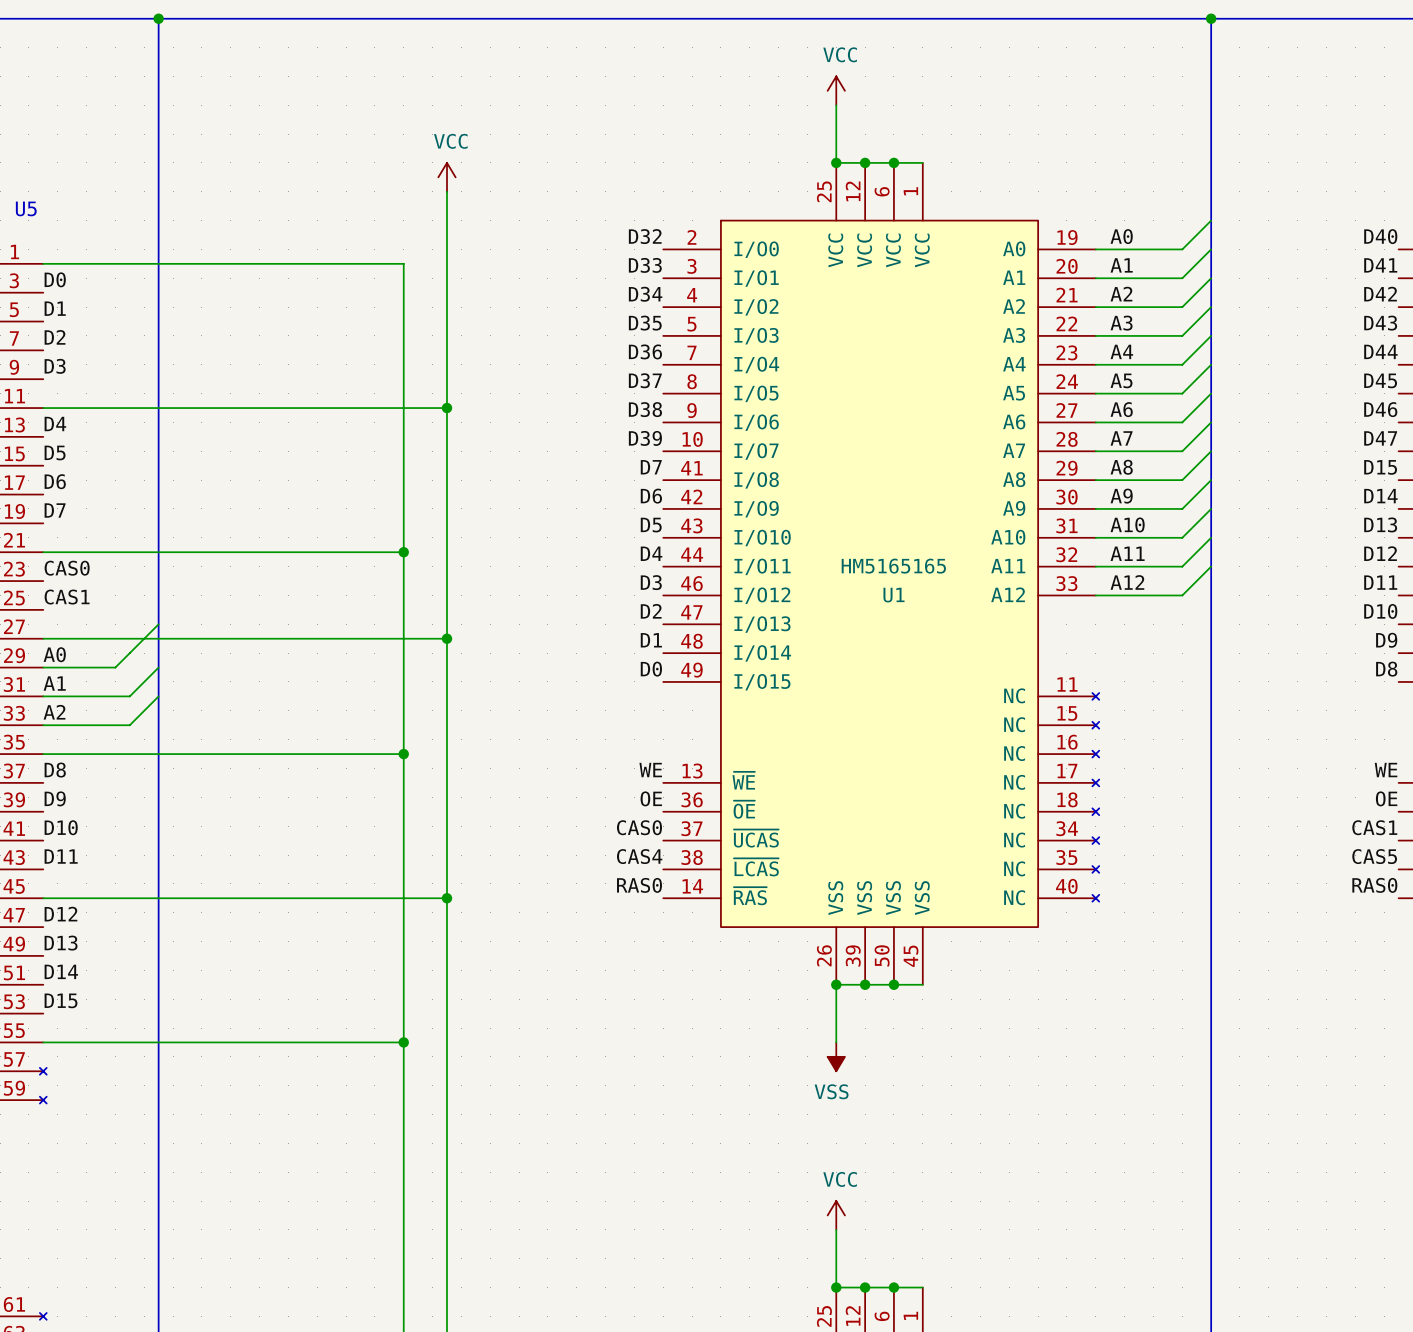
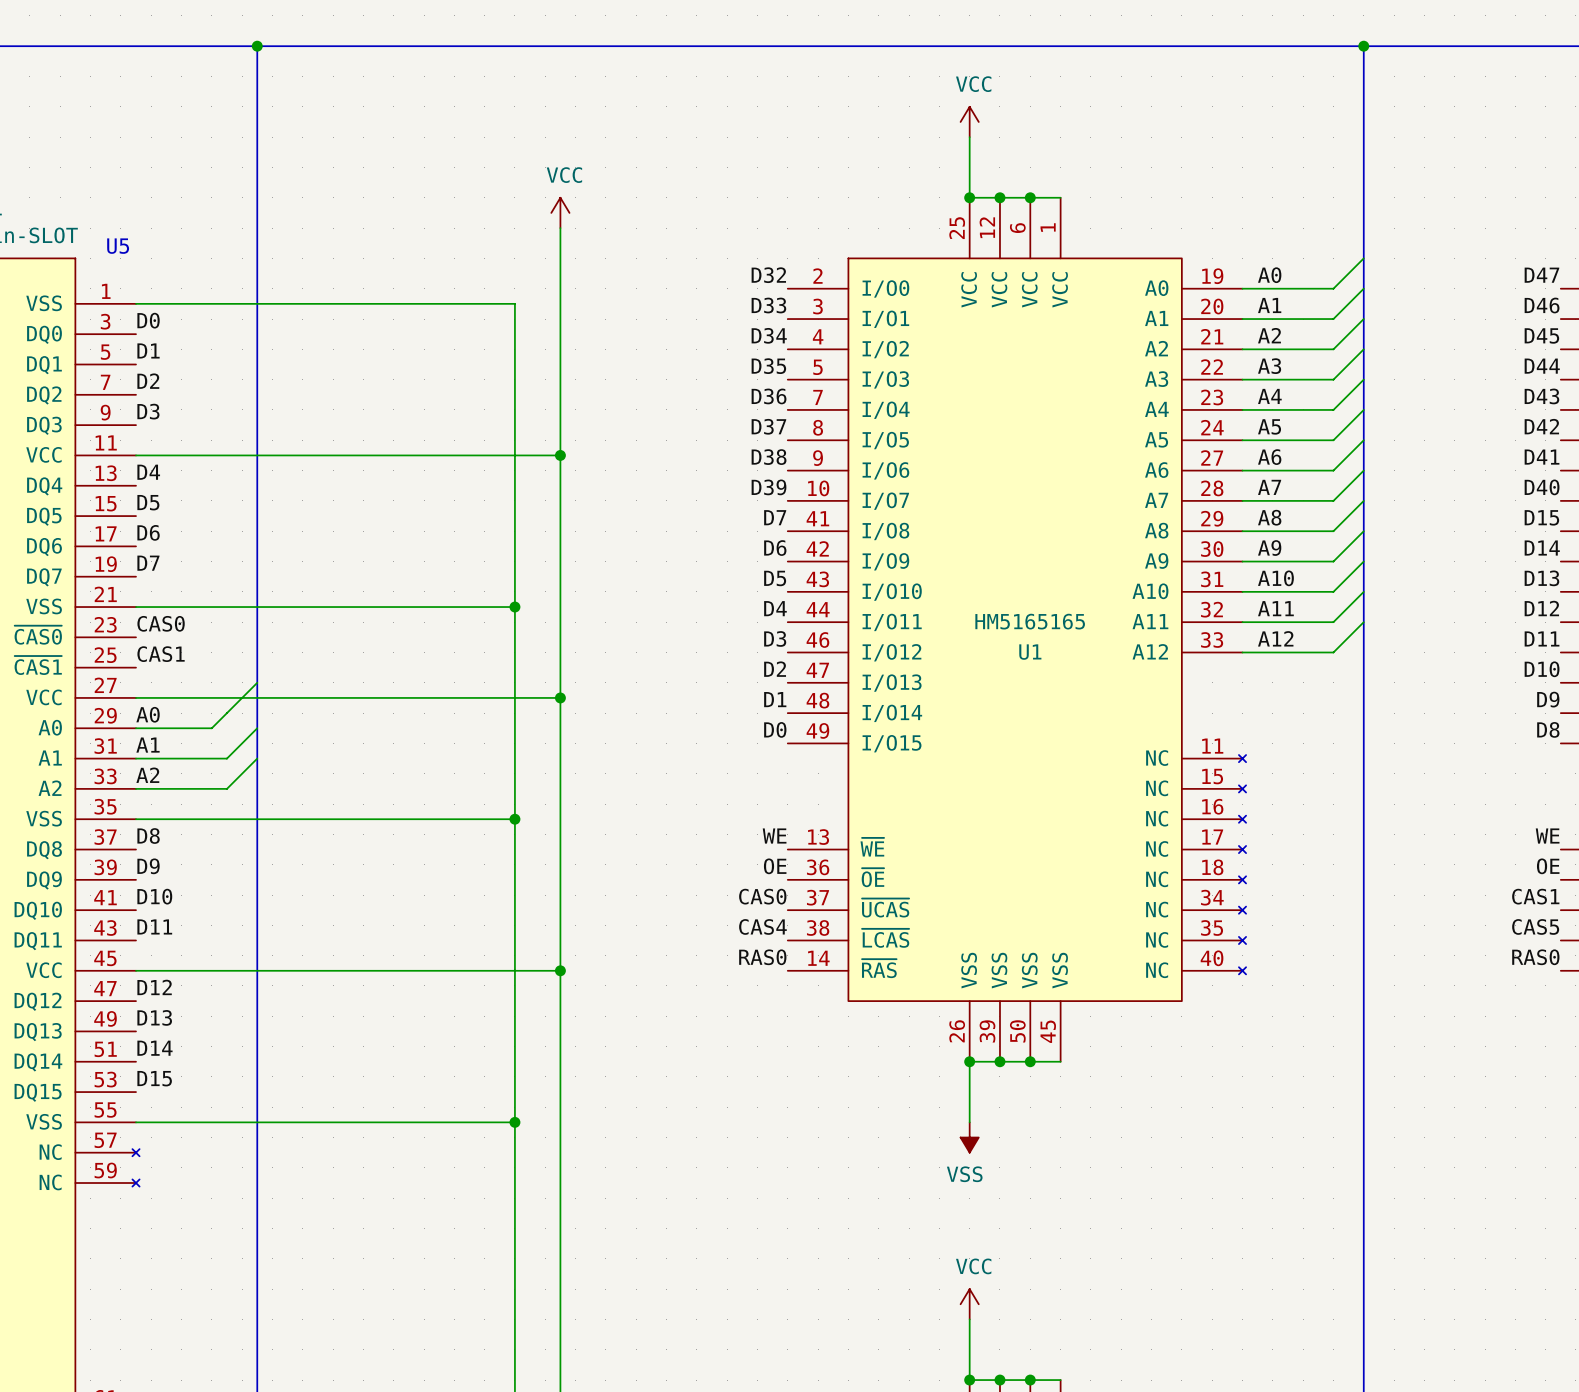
label: D40 (1380, 236) -> D47 (1541, 275)
label: D41 (1380, 265) -> D46 (1542, 305)
label: D42 (1380, 294) -> D45 (1541, 335)
label: D43 (1380, 323) -> D44 (1542, 366)
label: D44 (1380, 351) -> D43 (1541, 396)
label: D45 (1380, 380) -> D42 (1541, 426)
label: D46 (1380, 409) -> D41 (1542, 457)
label: D47 (1380, 438) -> D40 (1542, 487)

